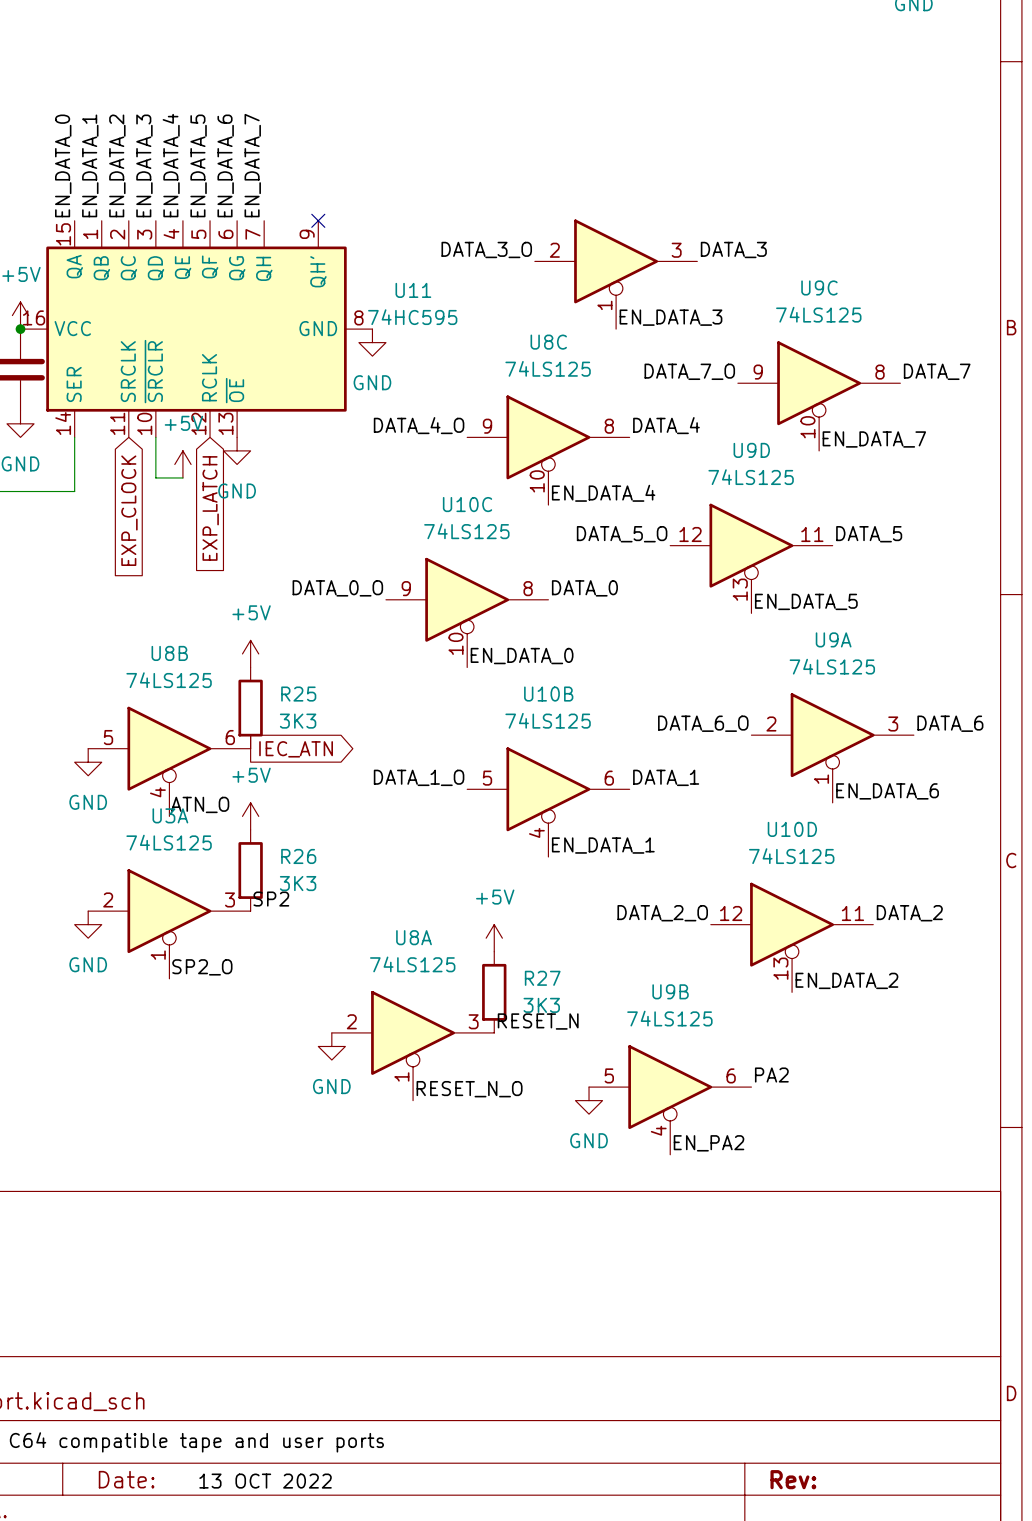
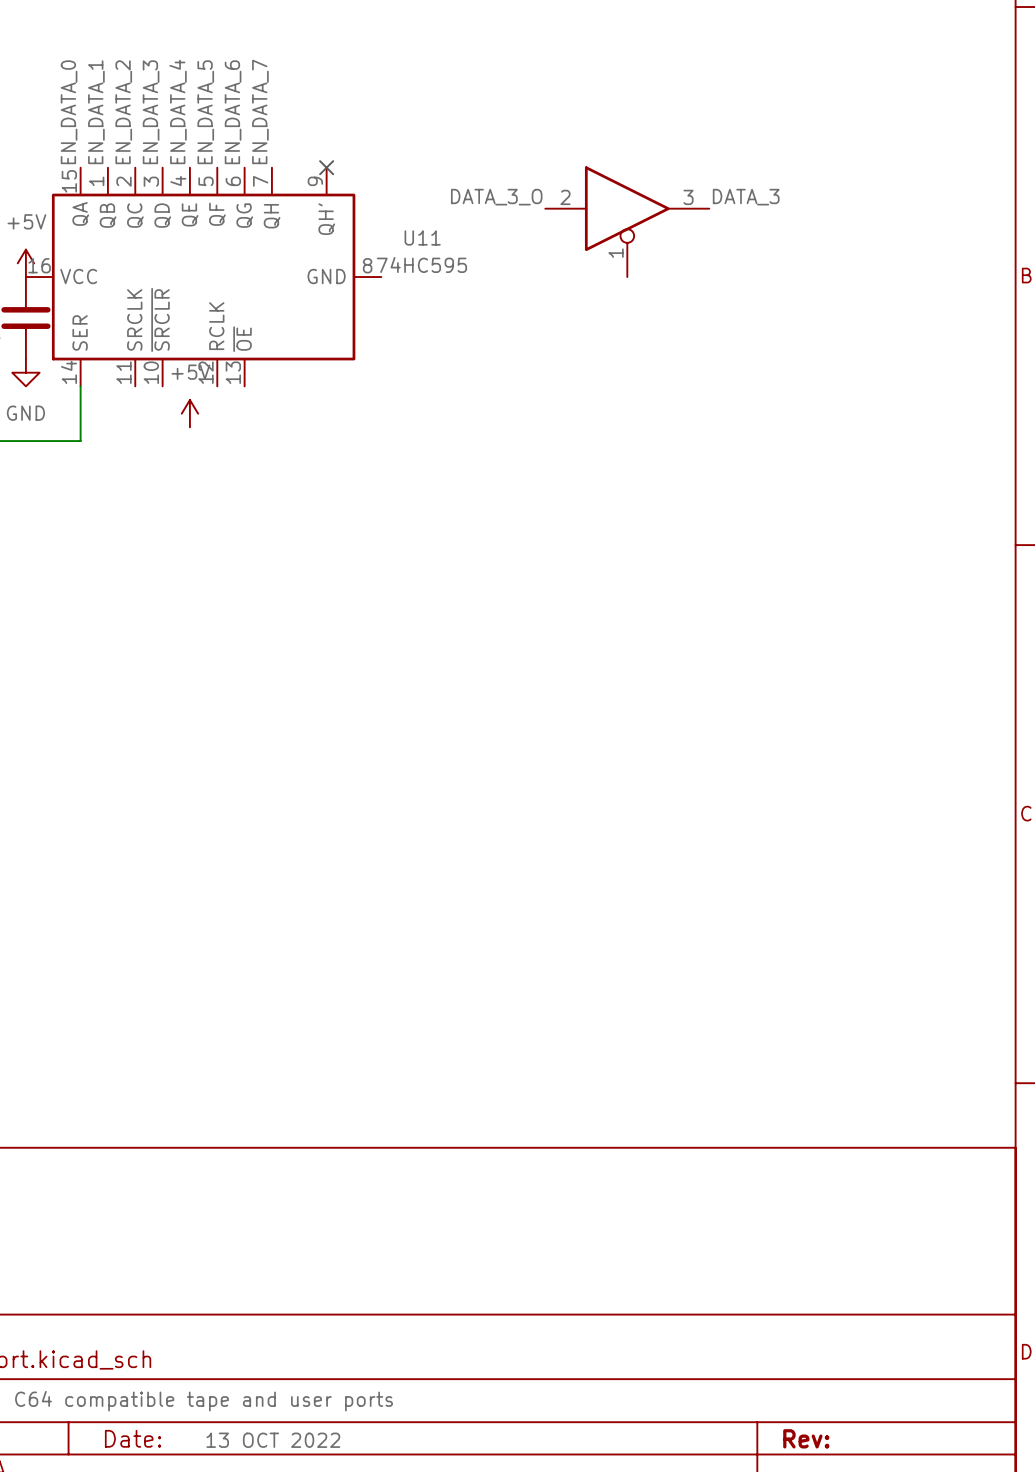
label: EN_DATA_3 (670, 317) -> none
junction: (20, 329) -> none
power symbol: GND (372, 342) -> none
label: DATA_7_O (689, 371) -> none
label: DATA_7 (937, 371) -> none
U9C: 74LS125 (819, 396) -> none
label: DATA_4_O (419, 425) -> none
label: DATA_4 (666, 425) -> none
wire: (155, 437) (155, 477) (182, 477) -> none
label: EN_DATA_7 (874, 439) -> none
power symbol: GND (237, 450) -> none
U8C: 74LS125 (548, 450) -> none
label: EN_DATA_4 (603, 493) -> none
global label: EXP_LATCH (210, 508) -> none
global label: EXP_CLOCK (129, 510) -> none
label: DATA_5_O (622, 534) -> none
label: DATA_5 (869, 534) -> none
U9D: 74LS125 (751, 558) -> none
label: DATA_0_O (337, 588) -> none
label: DATA_0 (584, 588) -> none
label: EN_DATA_5 (806, 601) -> none
U10C: 74LS125 (467, 612) -> none
power symbol: +5V (250, 653) -> none
label: EN_DATA_0 (522, 656) -> none
R25: 3K3 (250, 708) -> none
label: DATA_6_O (703, 723) -> none
label: DATA_6 (950, 723) -> none
U9A: 74LS125 (832, 748) -> none
global label: IEC_ATN (296, 749) -> none
U8B: 74LS125 (169, 761) -> none
power symbol: GND (88, 762) -> none
label: DATA_1_O (419, 777) -> none
label: DATA_1 (666, 777) -> none
label: EN_DATA_6 (887, 791) -> none
U10B: 74LS125 (548, 802) -> none
label: ATN_O (200, 804) -> none
power symbol: +5V (250, 816) -> none
label: EN_DATA_1 (603, 845) -> none
R26: 3K3 (250, 870) -> none
label: SP2 (271, 899) -> none
label: DATA_2_O (662, 913) -> none
label: DATA_2 (909, 913) -> none
U3A: 74LS125 (169, 923) -> none
power symbol: GND (88, 924) -> none
U10D: 74LS125 (792, 937) -> none
power symbol: +5V (494, 938) -> none
label: SP2_O (202, 967) -> none
label: EN_DATA_2 (846, 980) -> none
R27: 3K3 (494, 992) -> none
label: RESET_N (538, 1021) -> none
U8A: 74LS125 (413, 1045) -> none
power symbol: GND (331, 1046) -> none
label: PA2 (771, 1075) -> none
label: RESET_N_O (469, 1089) -> none
U9B: 74LS125 (670, 1099) -> none
power symbol: GND (589, 1100) -> none
label: EN_PA2 (709, 1143) -> none

